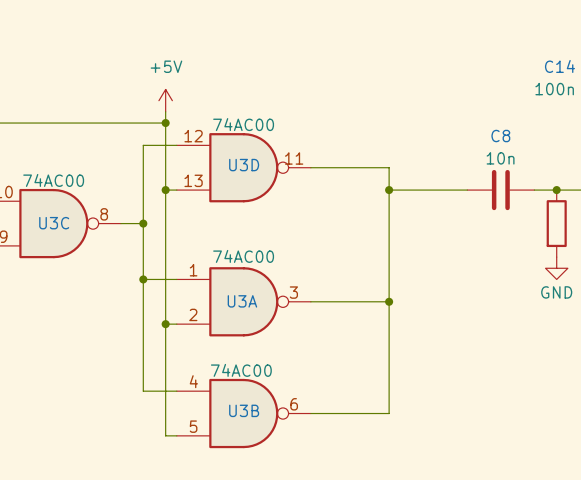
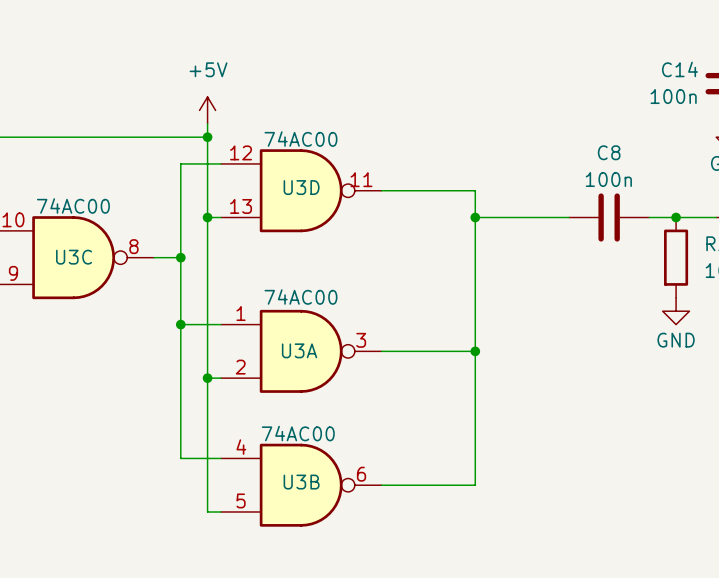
C8 value: 10n (500, 158) -> 100n (608, 179)

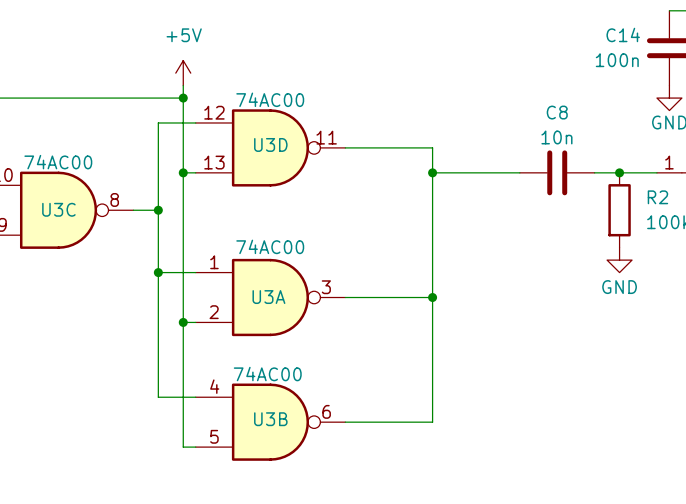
C8 value: 100n (608, 179) -> 10n (556, 137)

